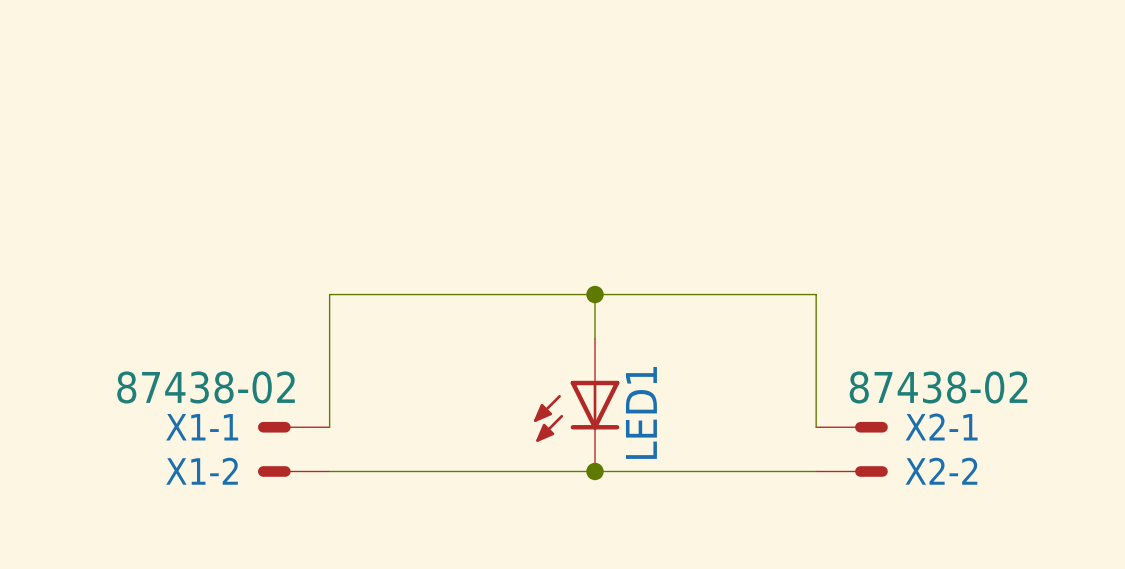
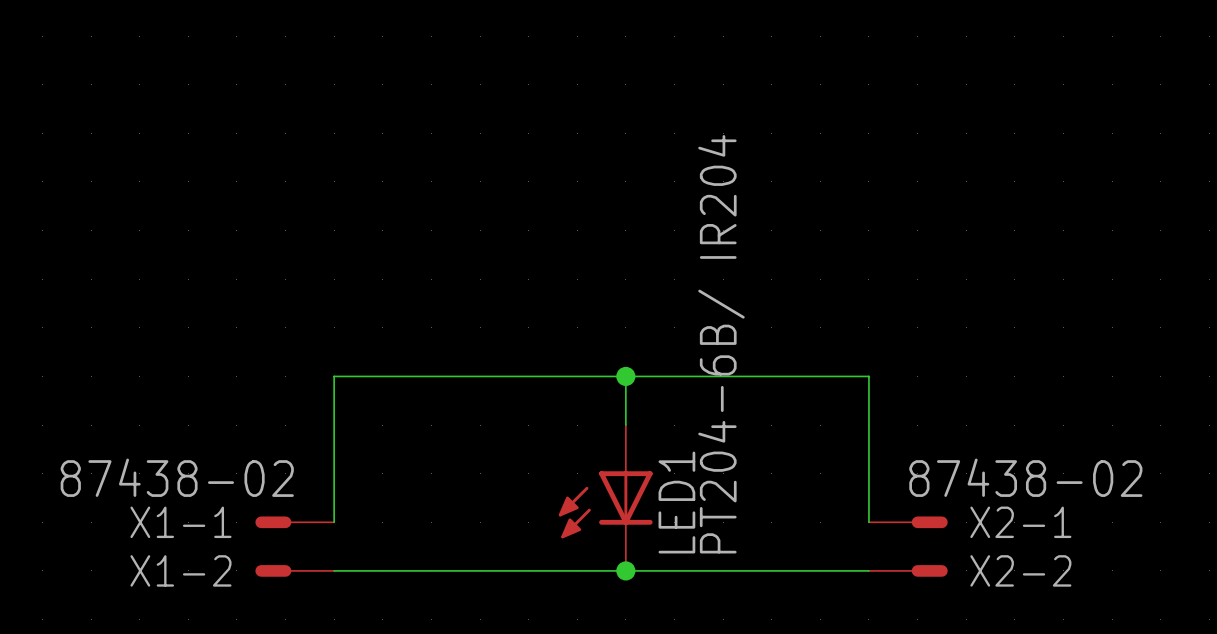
LED1 value: none -> PT204-6B/ IR204 (721, 344)

